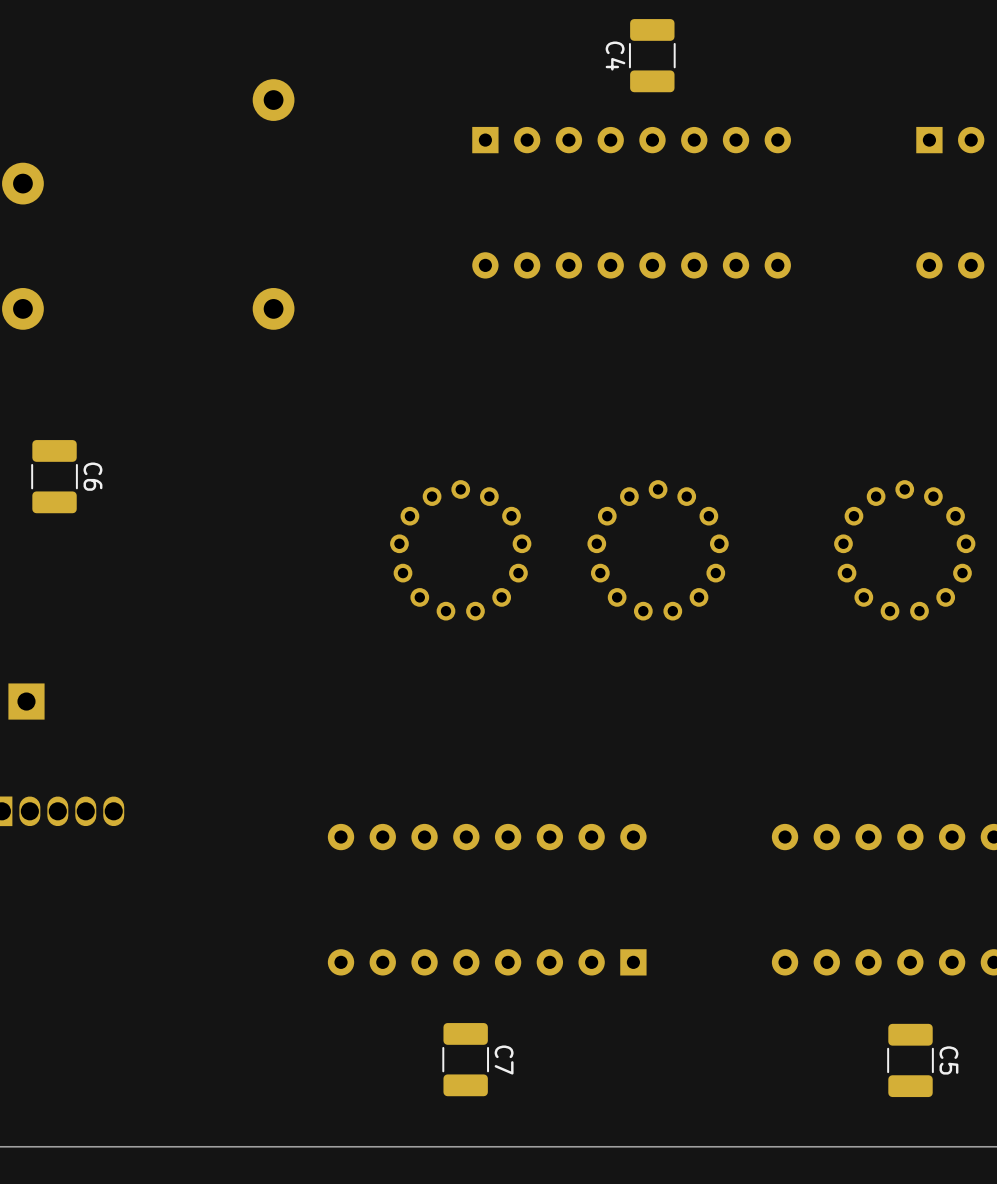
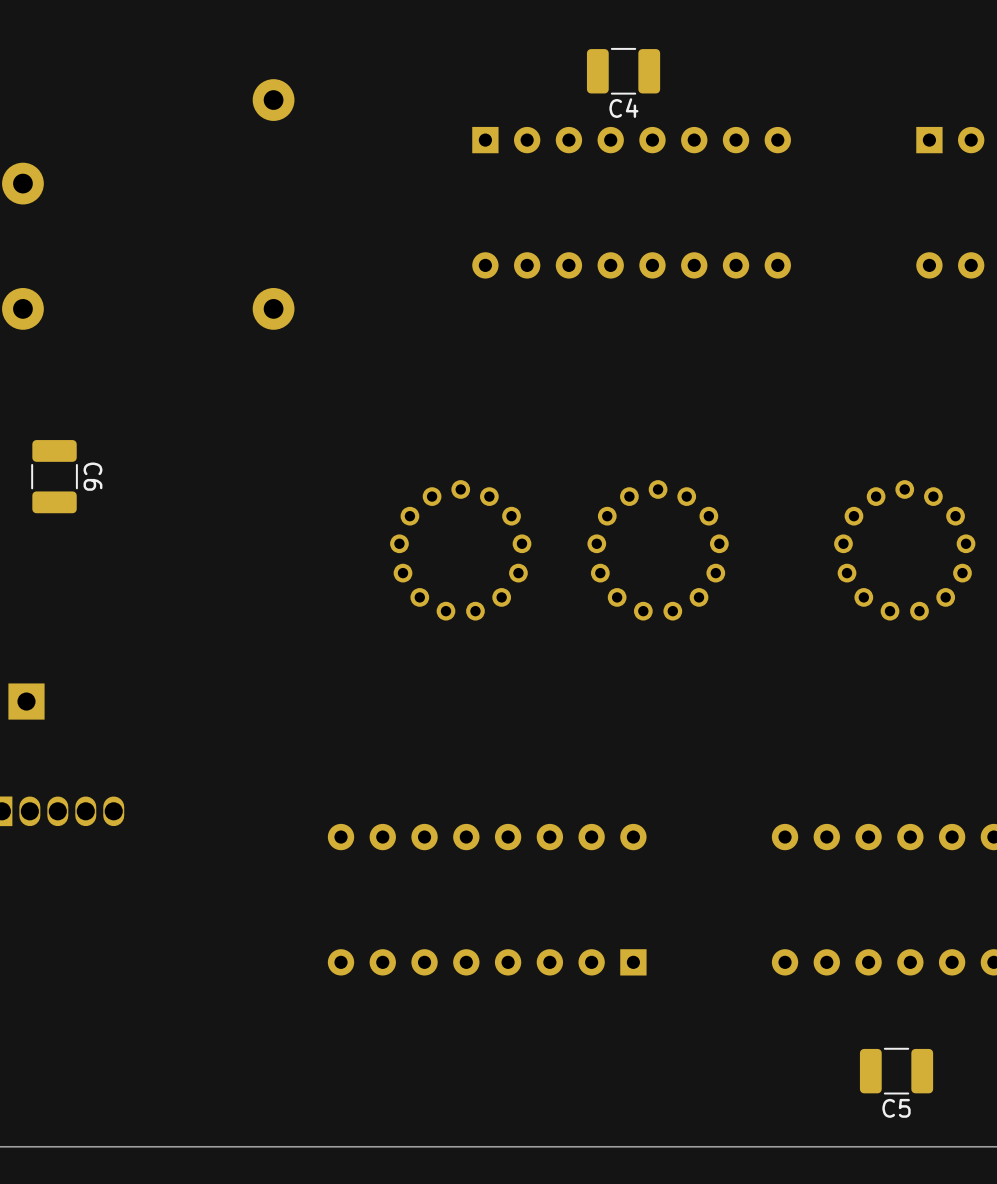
C4 rotation: 0° (652, 55) -> 90° clockwise (623, 71)
C4 name position: C4 (615, 56) -> C4 (623, 108)
C7: (465, 1059) -> none
C5 rotation: 0° (910, 1060) -> 90° clockwise (896, 1071)

